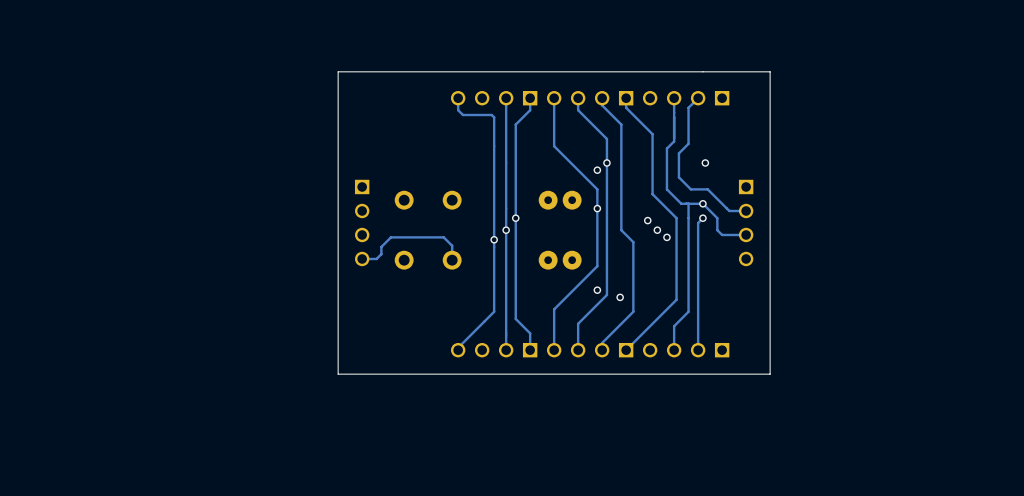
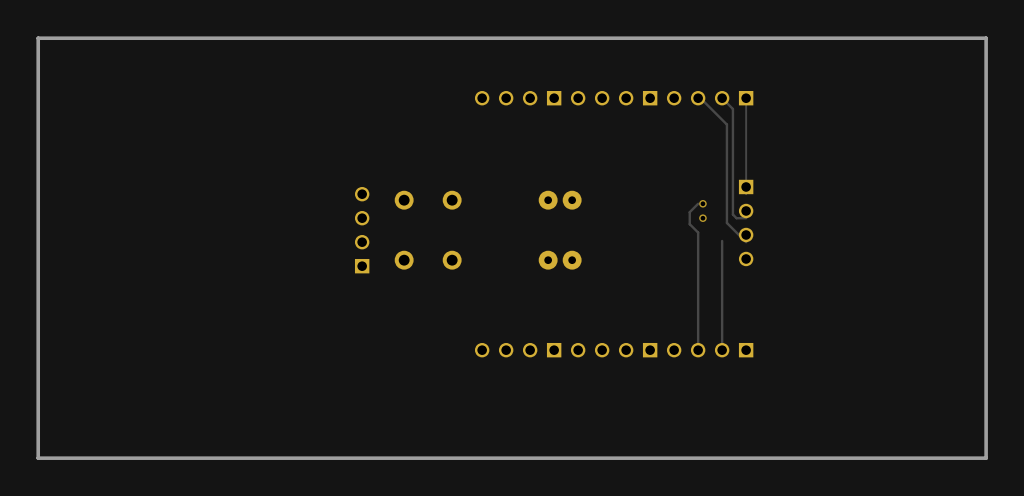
board edge: none -> (986, 38) (986, 458) (38, 458) (38, 38) (986, 38)
board edge: (770, 71) (338, 71) (338, 374) (770, 374) (770, 71) -> none
track: (458, 98) (458, 110) (462, 115) (491, 115) (494, 117) (494, 311) (458, 347) (458, 350) -> none
part position: (494, 98) -> (518, 98)
track: (506, 98) (506, 350) -> none
track: (530, 98) (530, 110) (515, 124) (515, 318) (530, 333) (530, 350) -> none
track: (554, 98) (554, 146) (597, 189) (597, 266) (554, 309) (554, 350) -> none
track: (578, 98) (578, 110) (606, 138) (606, 294) (578, 323) (578, 350) -> none
part position: (590, 98) -> (614, 98)
track: (602, 98) (602, 105) (621, 124) (621, 230) (633, 242) (633, 311) (602, 342) (602, 350) -> none
track: (626, 98) (626, 107) (652, 134) (652, 194) (676, 218) (676, 299) (626, 350) -> none
track: (674, 98) (674, 141) (666, 148) (666, 189) (681, 203) (702, 203) (717, 218) (717, 230) (722, 234) (746, 234) -> none
part position: (686, 98) -> (710, 98)
track: (698, 98) (688, 107) (688, 143) (678, 153) (678, 177) (690, 189) (707, 189) (729, 210) (746, 210) -> (698, 98) (700, 98) (726, 124) (726, 222) (746, 242)
track: none -> (722, 98) (732, 109) (732, 214) (736, 218) (746, 218)
track: none -> (746, 98) (746, 194)
via: (606, 162) -> none
via: (705, 162) -> none
via: (597, 170) -> none
track: (688, 203) (688, 311) (674, 326) (674, 350) -> none
via: (597, 208) -> none
via: (515, 218) -> none
track: (702, 218) (698, 222) (698, 232) -> (698, 203) (689, 212) (689, 224) (698, 232)
via: (647, 220) -> none
part rotation: 0° (362, 222) -> 180° (362, 230)
via: (506, 230) -> none
via: (657, 230) -> none
via: (666, 237) -> none
via: (494, 239) -> none
track: none -> (722, 240) (722, 350)
track: (362, 258) (376, 258) (381, 254) (381, 246) (390, 237) (443, 237) (452, 245) (452, 260) -> none
via: (597, 290) -> none
via: (620, 297) -> none
part position: (494, 350) -> (518, 350)
part position: (590, 350) -> (614, 350)
part position: (686, 350) -> (710, 350)

